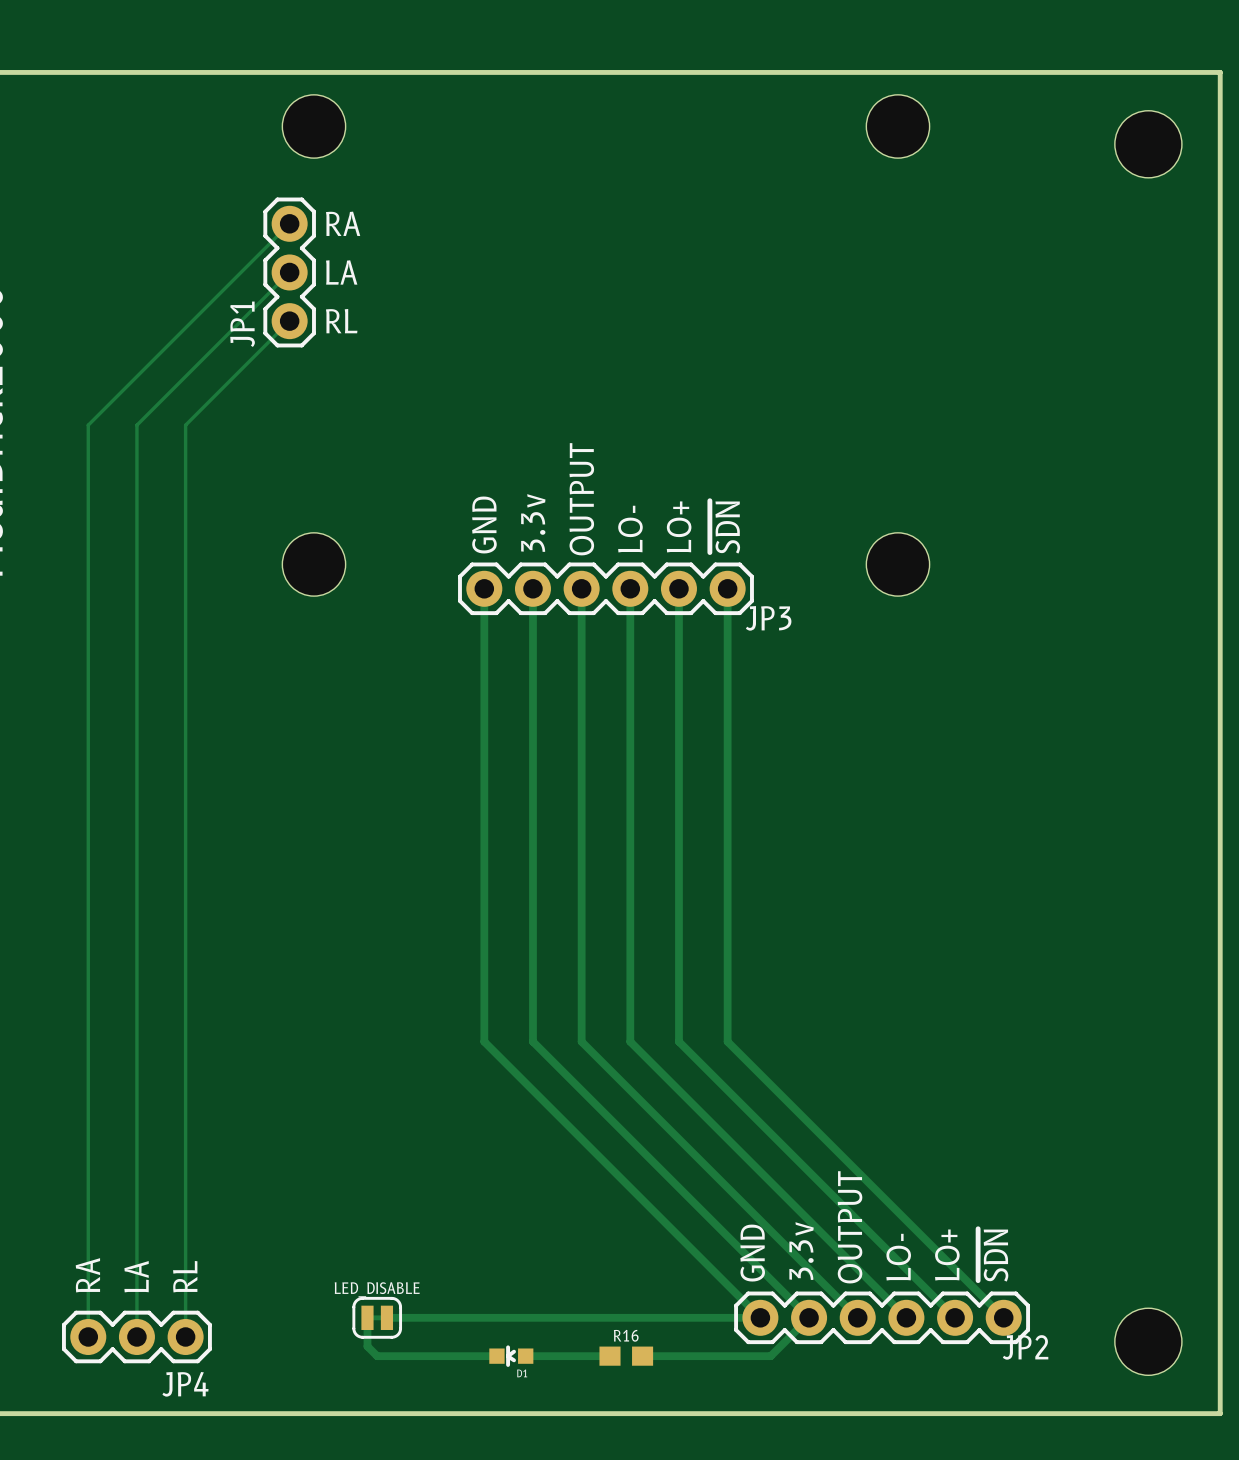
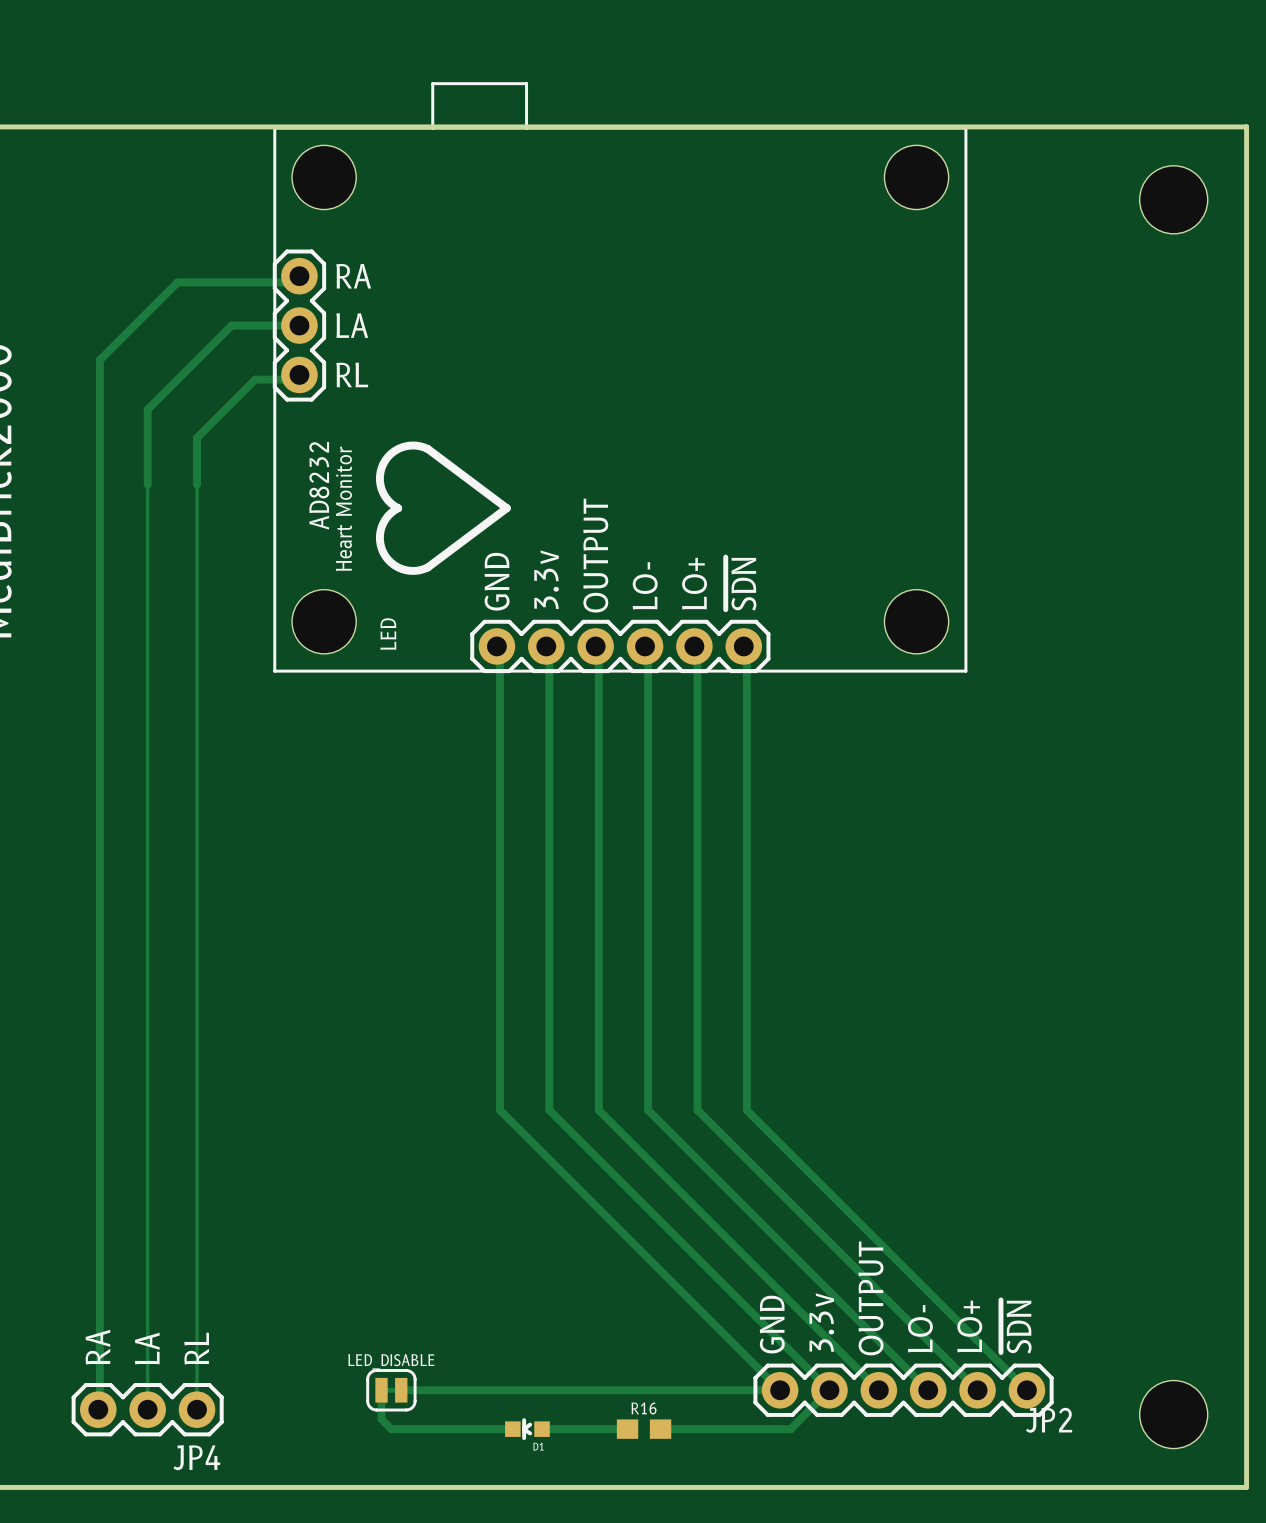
part: (313, 126) -> none
part: (897, 126) -> none
track: (289, 223) (88, 425) (88, 1336) -> (299, 276) (293, 282) (177, 282) (99, 360) (99, 1408) (98, 1409)
text: RA (343, 223) -> none
track: (289, 272) (136, 425) -> (299, 325) (231, 325) (147, 409) (147, 484)
JP1: (289, 272) -> none
text: LA (341, 272) -> none
part: none -> (620, 377)
track: (289, 321) (185, 425) -> (299, 374) (294, 379) (255, 379) (197, 437) (197, 484)
text: RL (341, 321) -> none
text: OUTPUT (581, 499) -> none
text: 3.3v (533, 523) -> none
text: GND (484, 525) -> none
text: LO+ (679, 526) -> none
text: ~{SDN} (724, 527) -> none
text: LO- (630, 529) -> none
part: (313, 564) -> none
part: (897, 564) -> none
JP3: (605, 588) -> none

